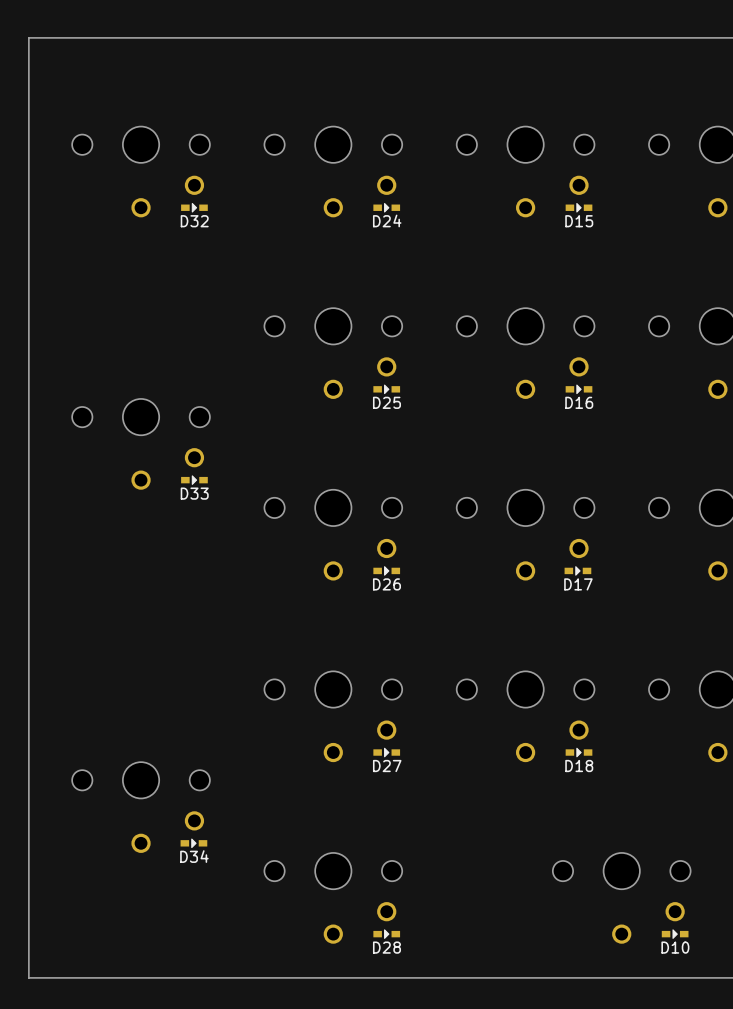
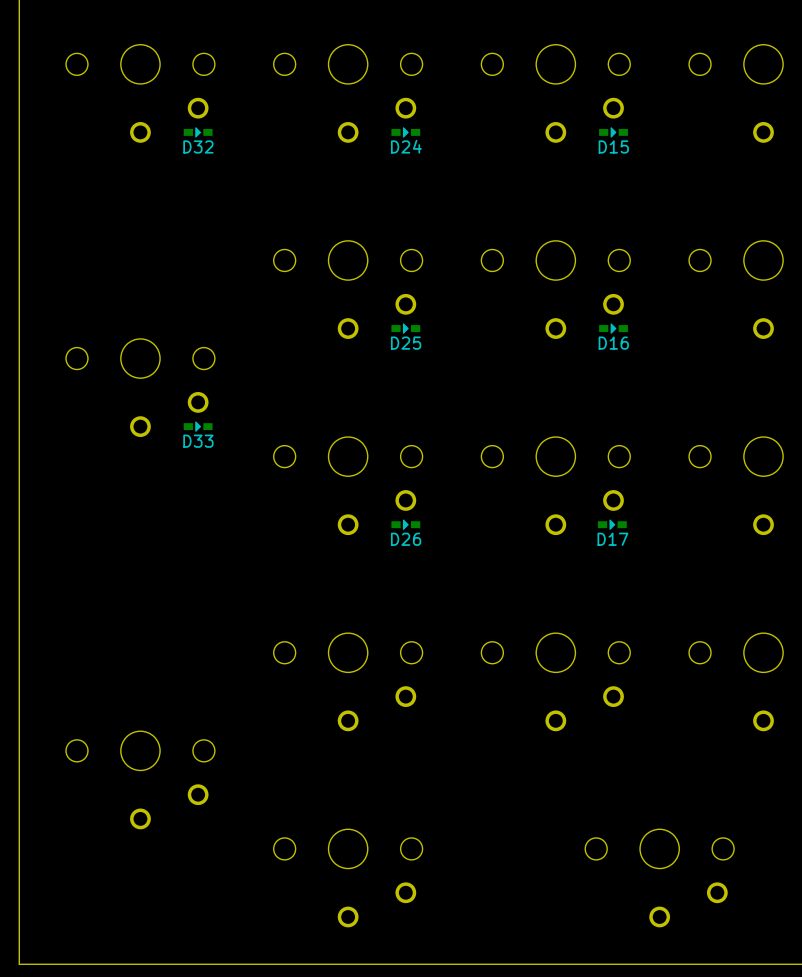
D27: (386, 752) -> none
D18: (579, 752) -> none
D34: (193, 843) -> none
D28: (386, 934) -> none
D10: (675, 934) -> none

